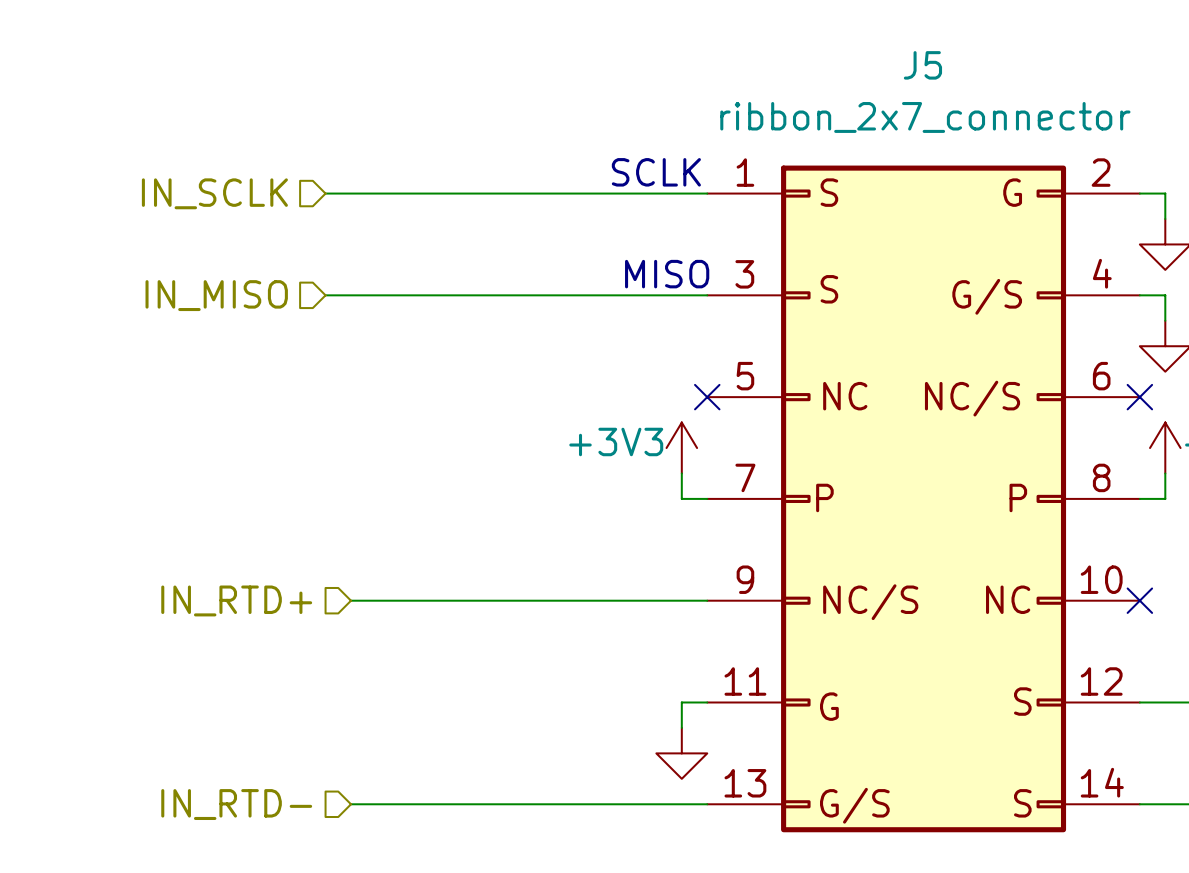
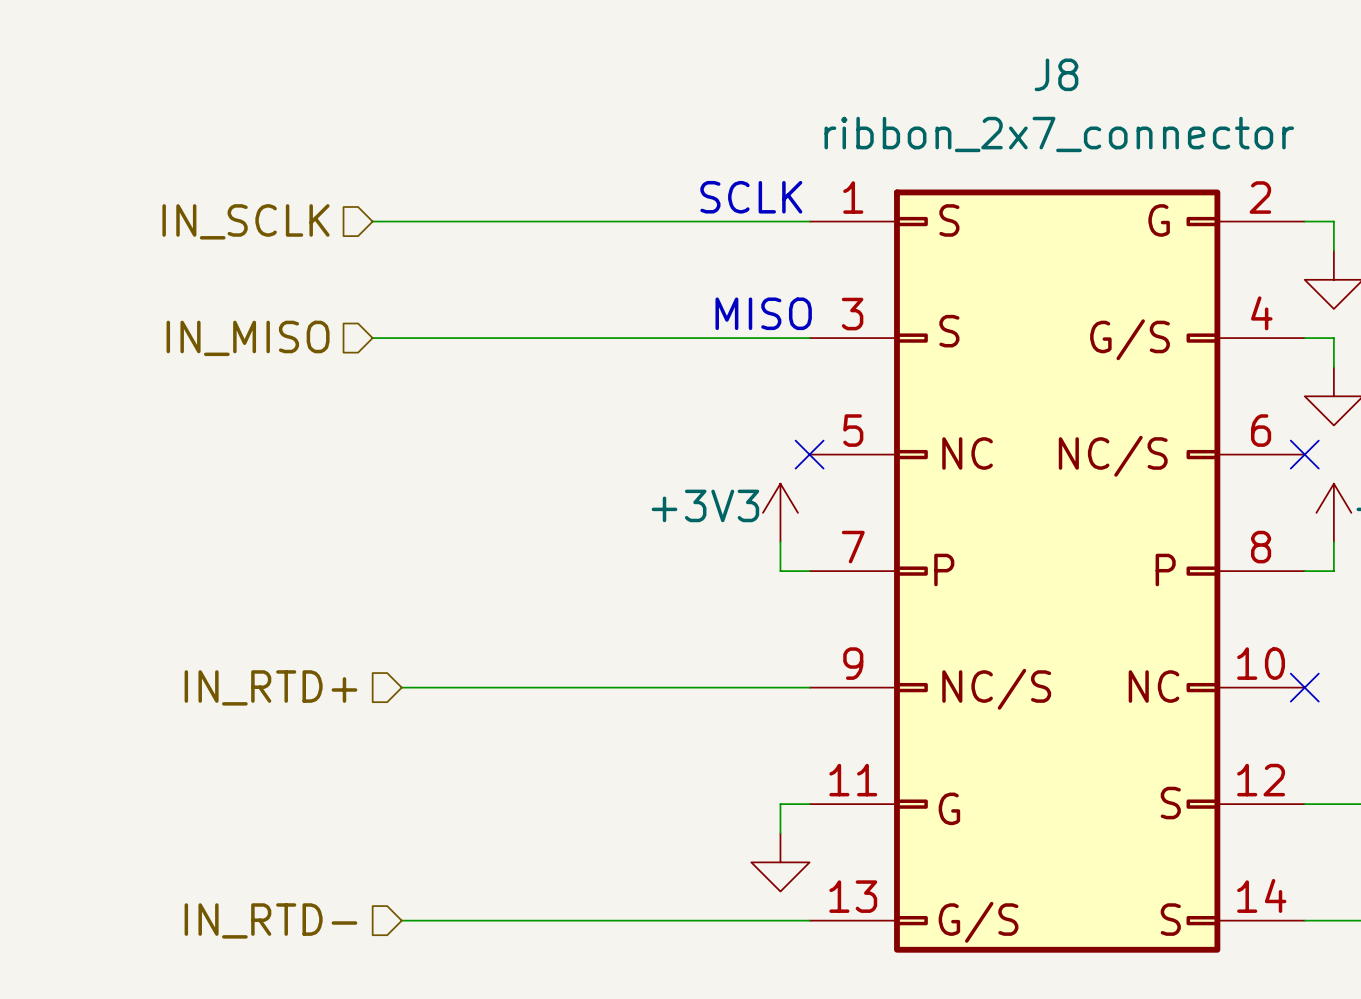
J5 name: J5 (922, 65) -> J8 (1056, 74)

